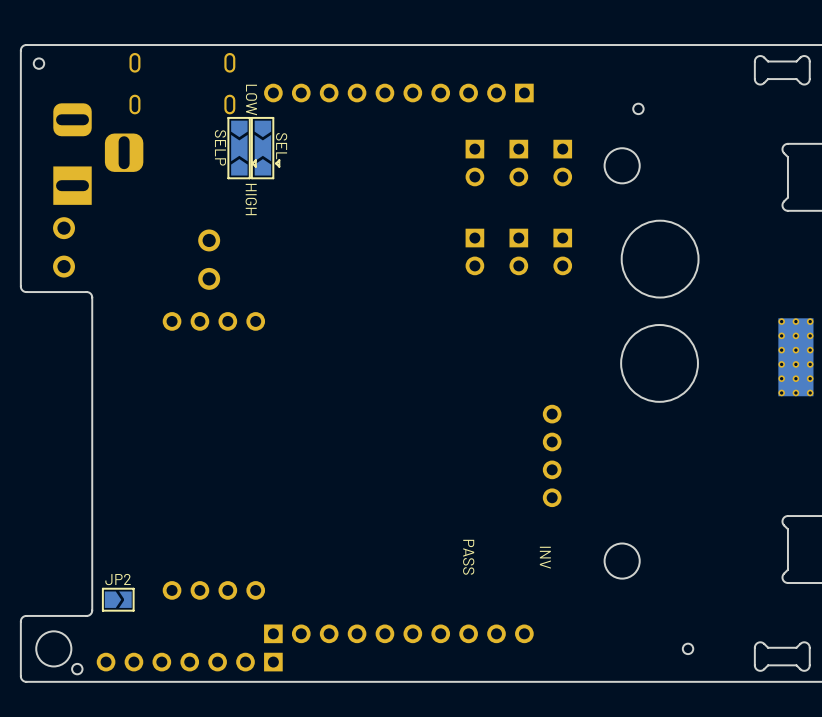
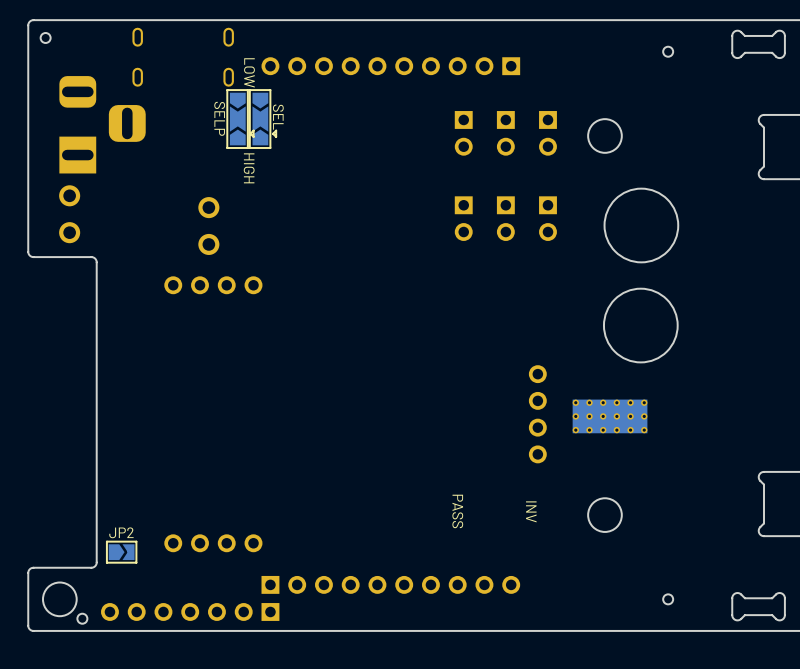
round board edge position: (638, 108) -> (668, 51)
part rotation: 0° (795, 357) -> 90° clockwise (610, 416)
part position: (795, 357) -> (610, 416)

